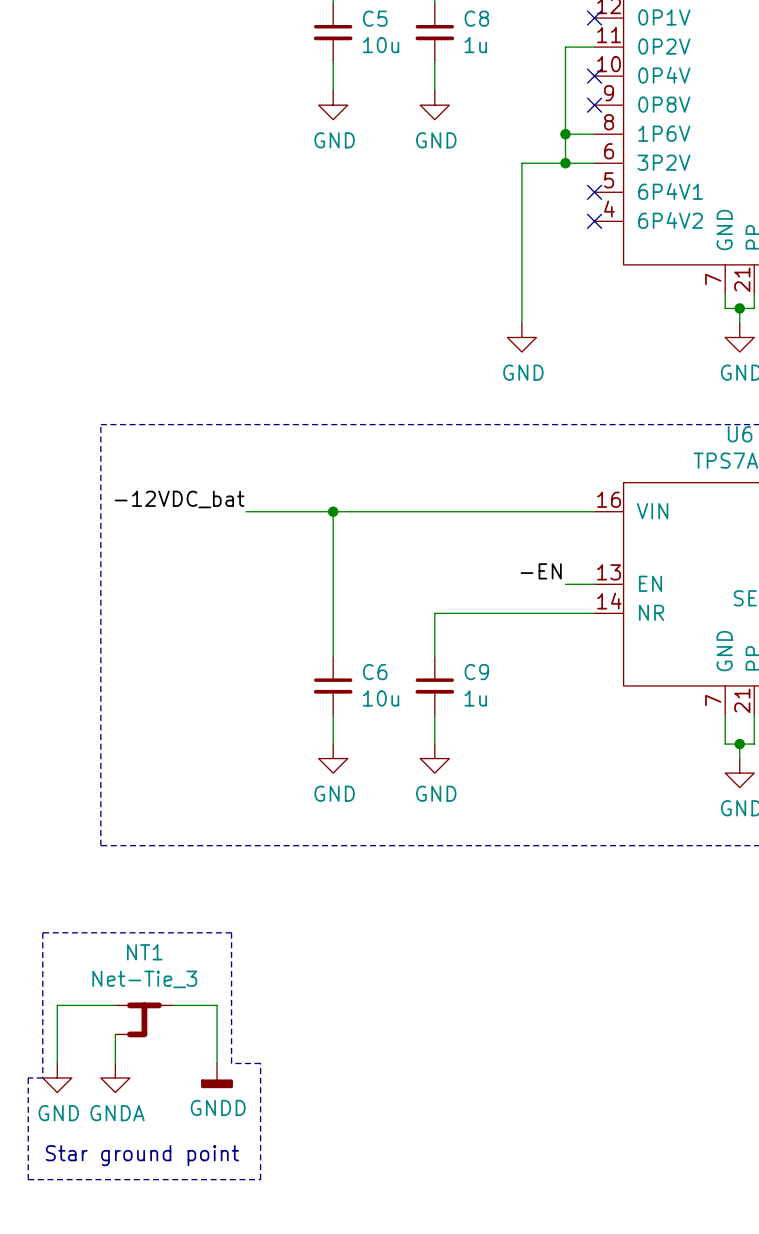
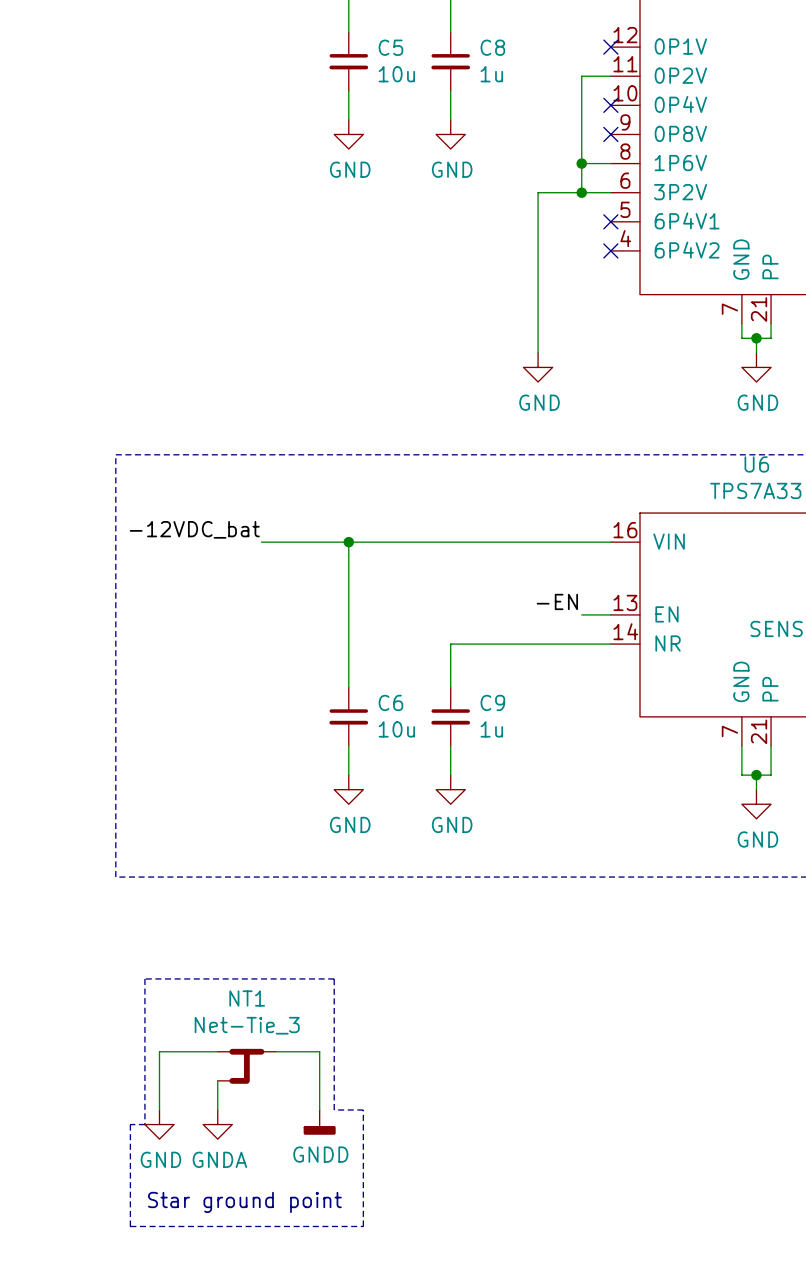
line: (42, 932) (42, 1077) (28, 1077) (28, 1179) (260, 1179) (260, 1063) (231, 1063) (231, 932) (42, 932) -> (144, 978) (144, 1124) (130, 1124) (130, 1226) (363, 1226) (363, 1110) (334, 1110) (334, 978) (144, 978)
wire: (115, 1005) (57, 1005) (57, 1063) -> (217, 1051) (159, 1051) (159, 1110)
wire: (173, 1005) (217, 1005) (217, 1063) -> (275, 1051) (319, 1051) (319, 1110)
NT1 position: (144, 1019) -> (246, 1066)
wire: (115, 1034) (115, 1063) -> (217, 1080) (217, 1110)
power symbol position: GNDD (217, 1075) -> GNDD (319, 1122)
power symbol position: GND (57, 1077) -> GND (159, 1124)
power symbol position: GNDA (115, 1077) -> GNDA (217, 1124)
text position: Star ground point (142, 1155) -> Star ground point (244, 1202)

